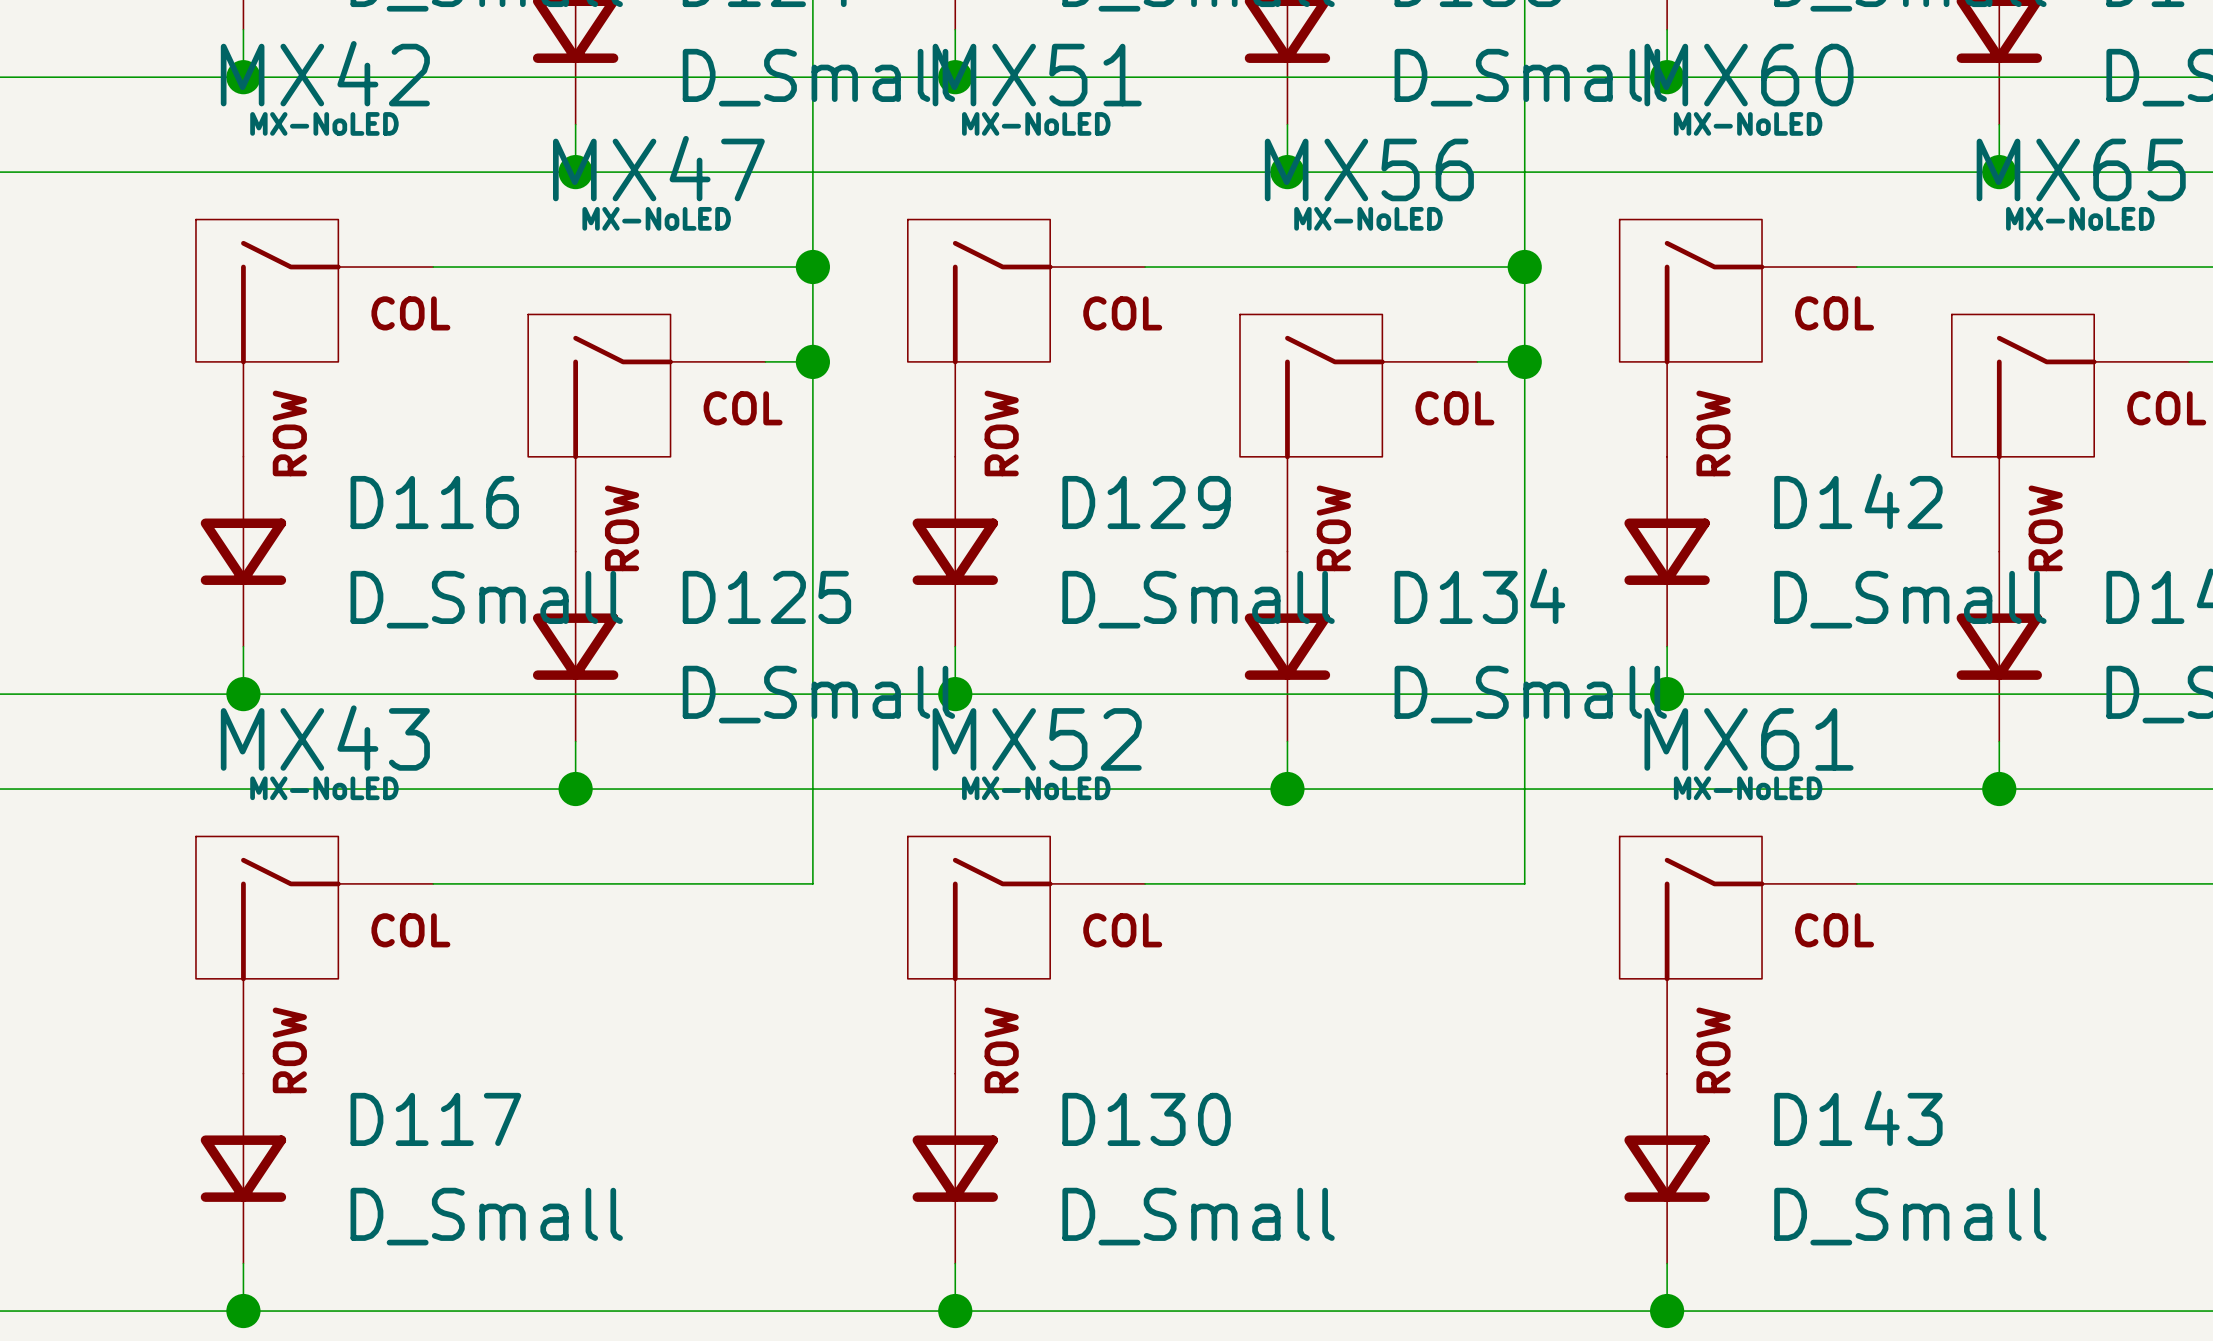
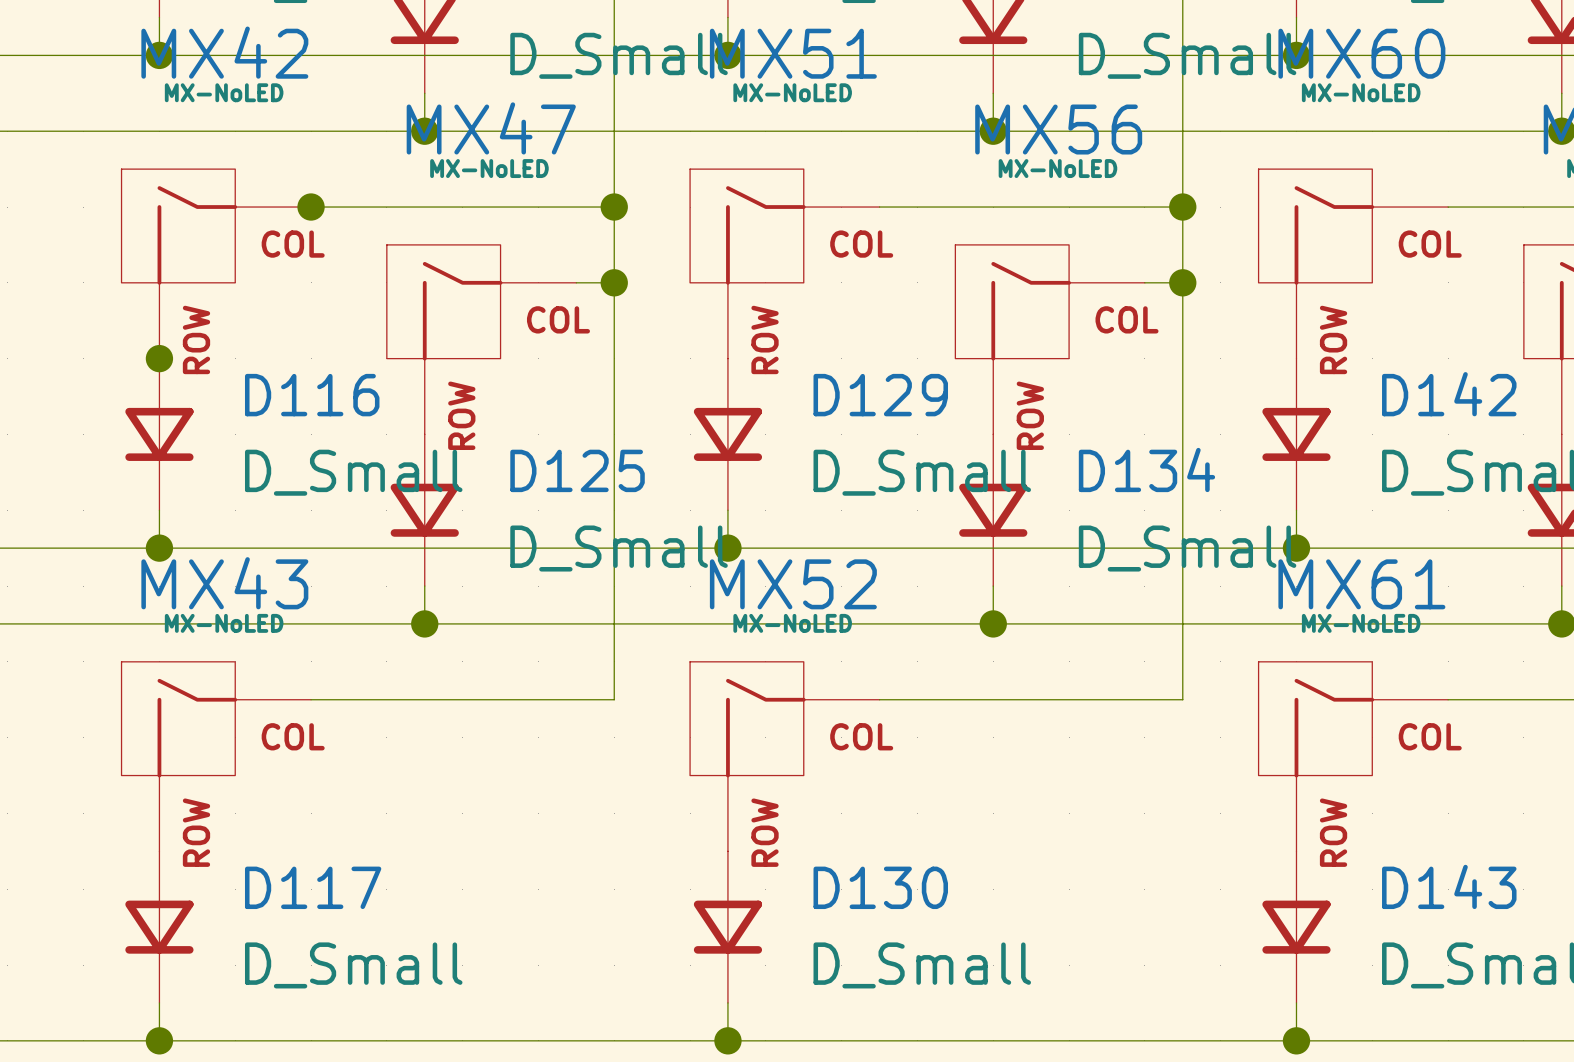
junction: none -> (311, 207)
junction: none -> (159, 358)

